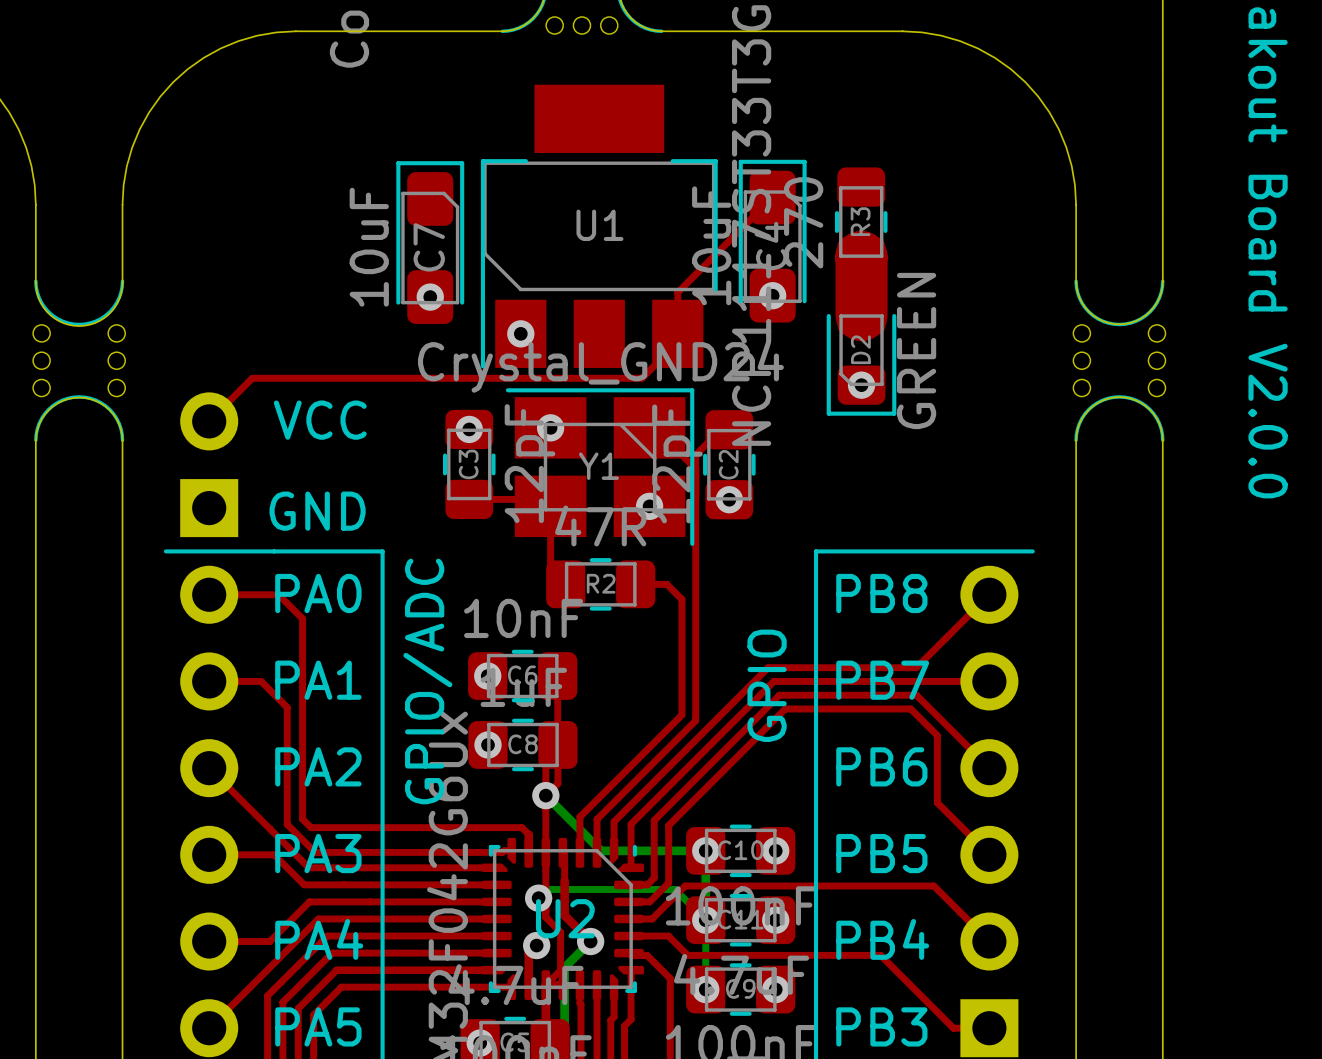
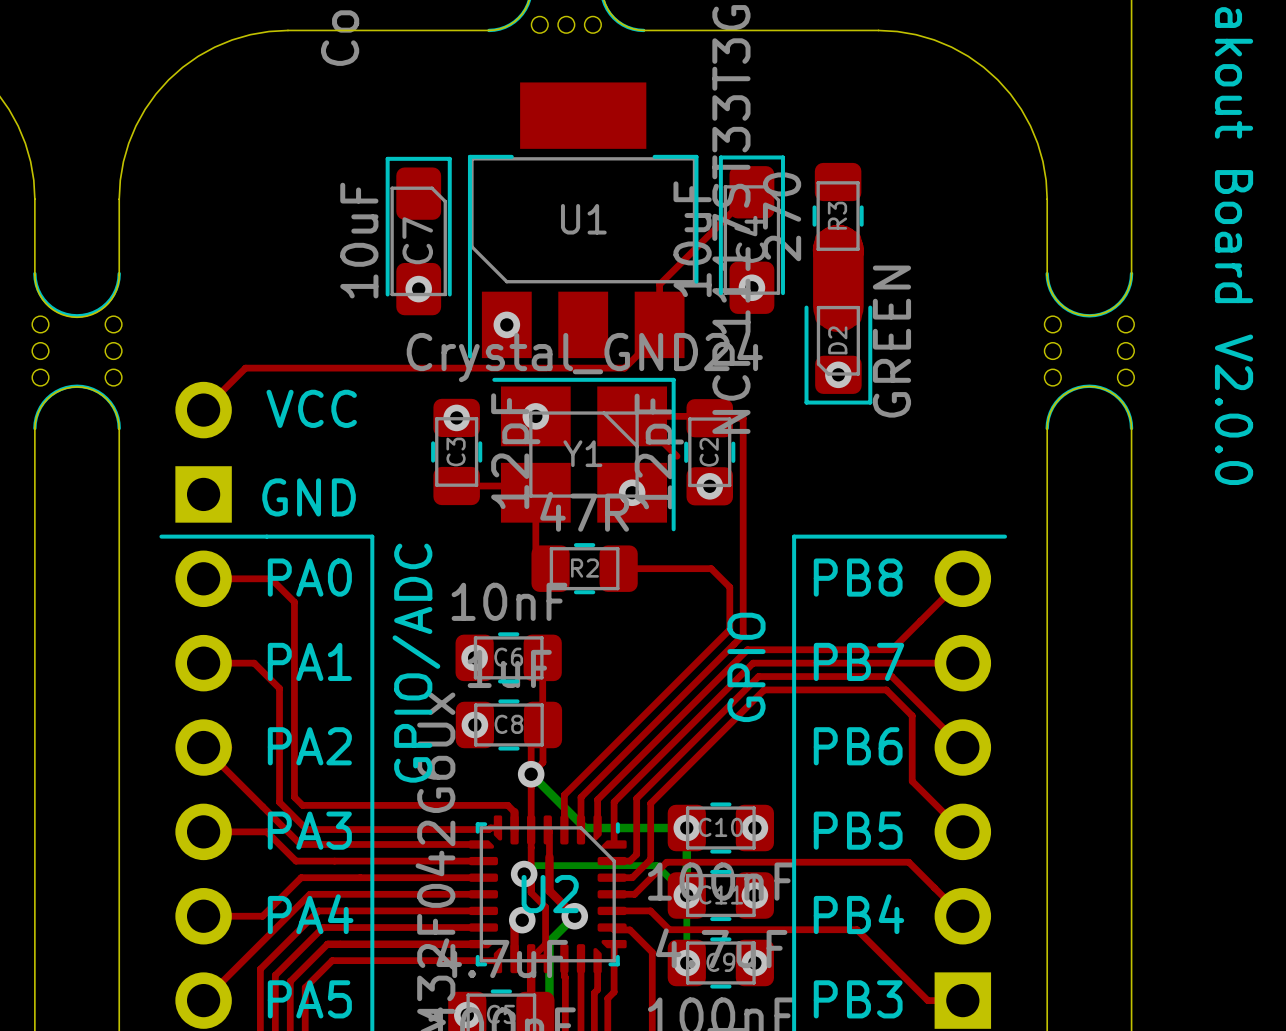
top track: (724, 426) (695, 455) (695, 720) -> (637, 416) (743, 418) (743, 635) (677, 701)
top track: (666, 584) (681, 599) (681, 714) -> (649, 568) (711, 568) (729, 587) (729, 629) (663, 695)

